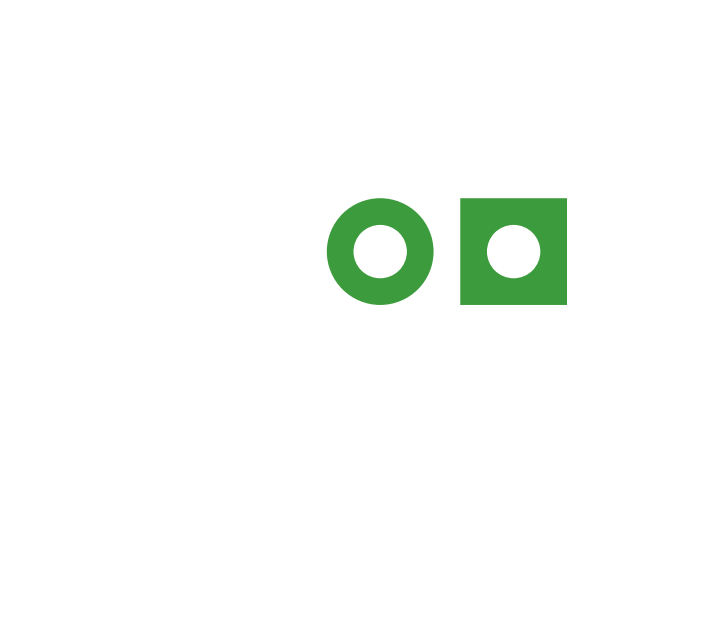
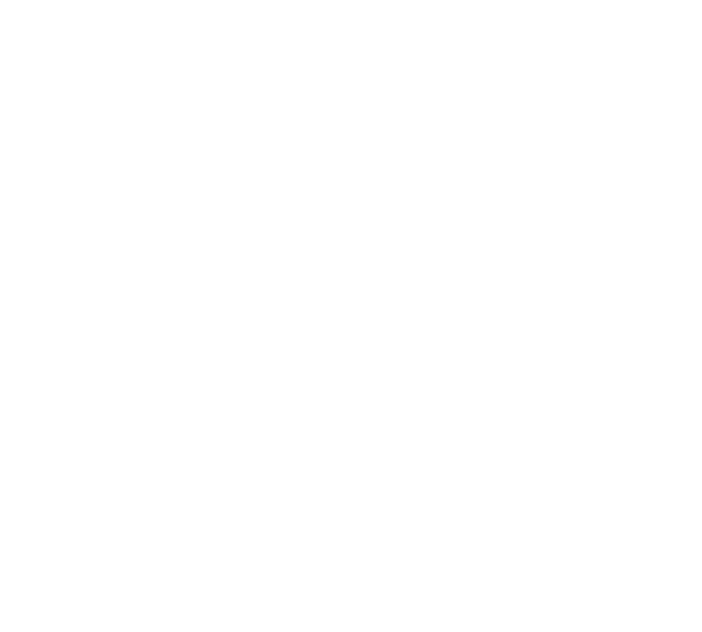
part: (446, 251) -> none

